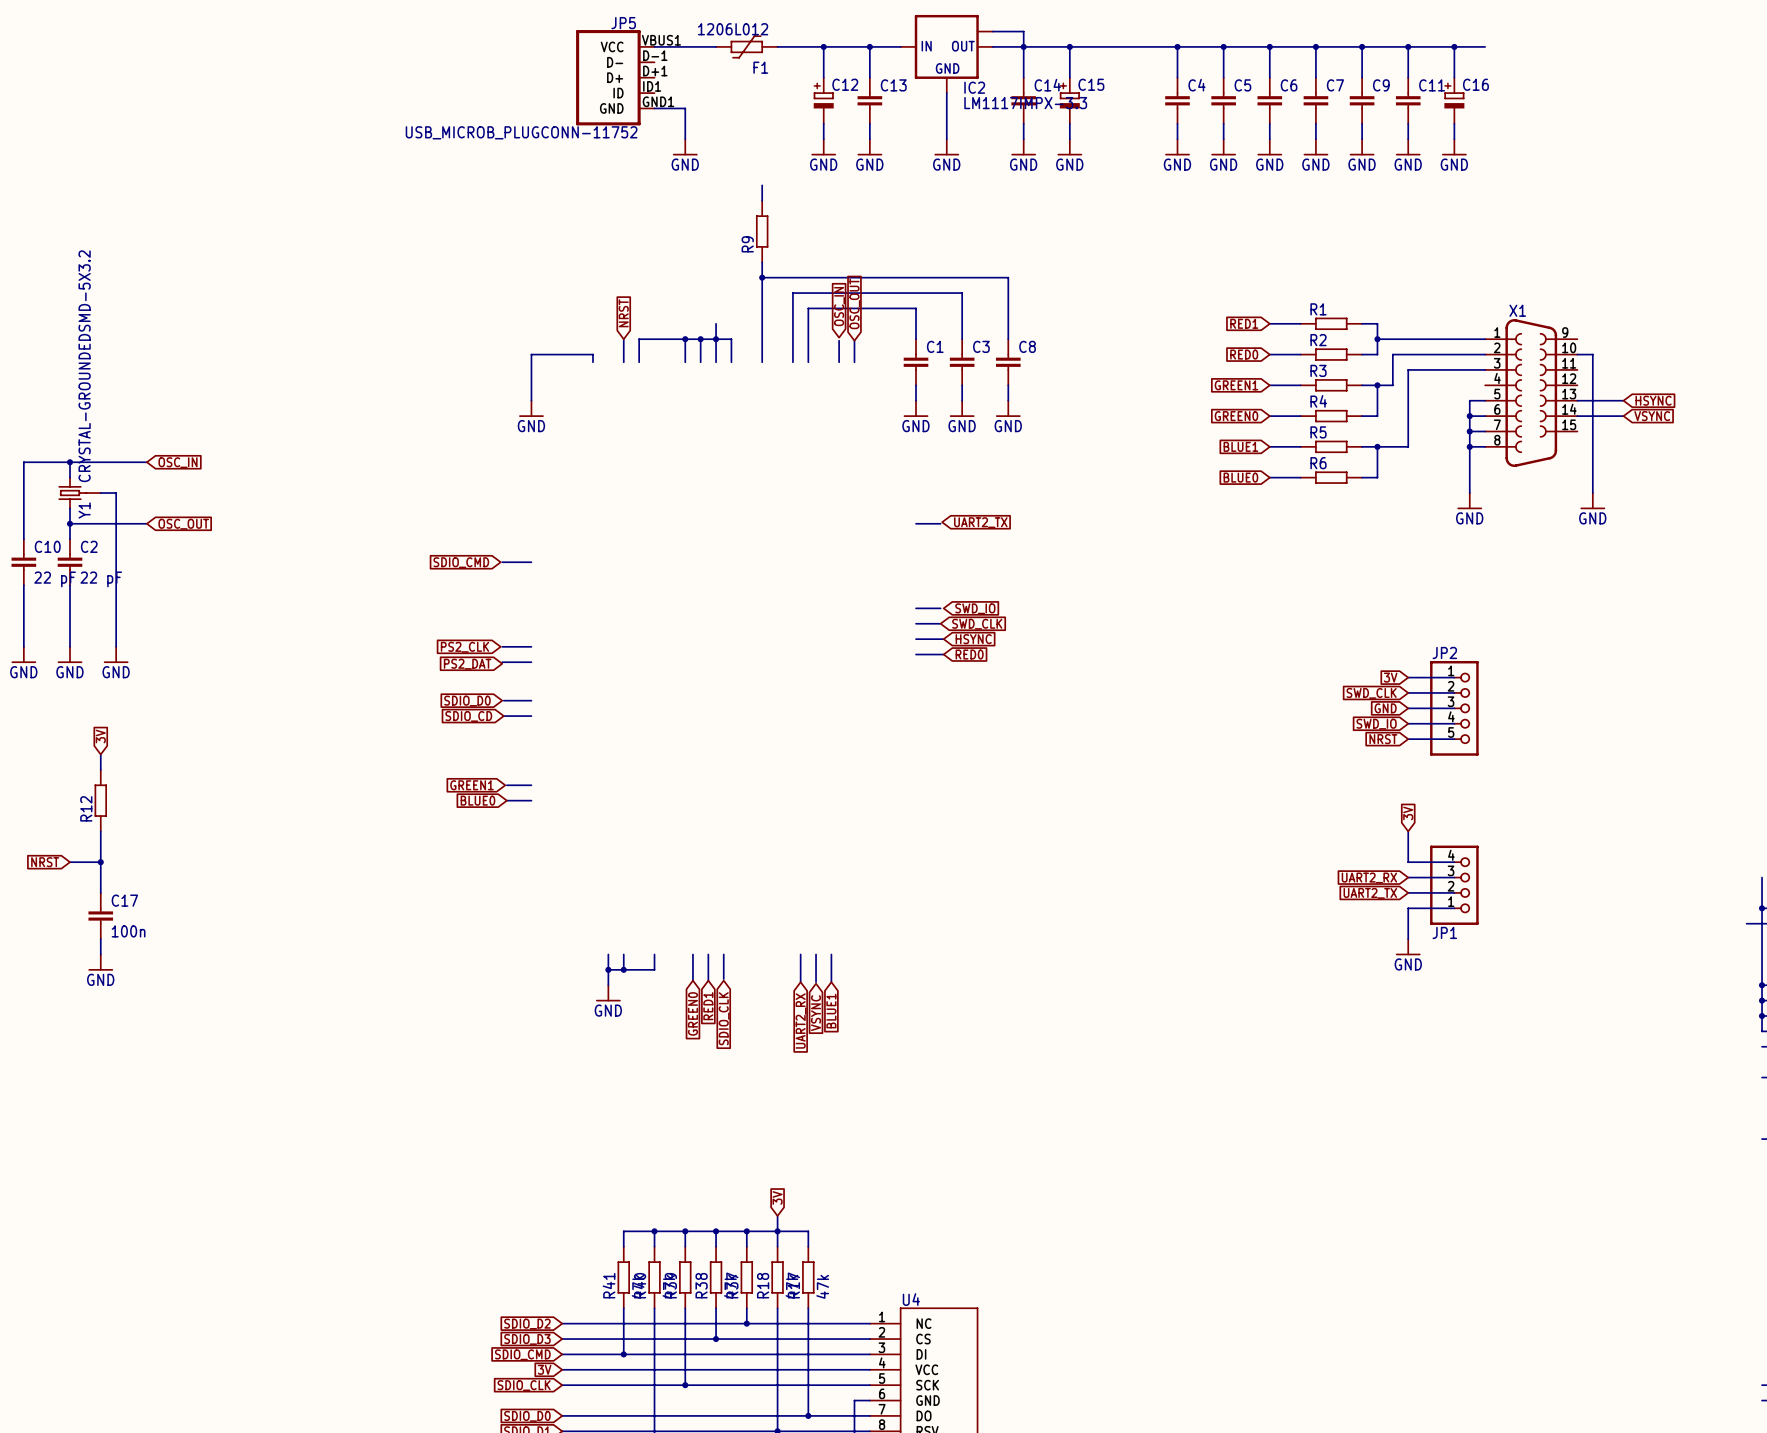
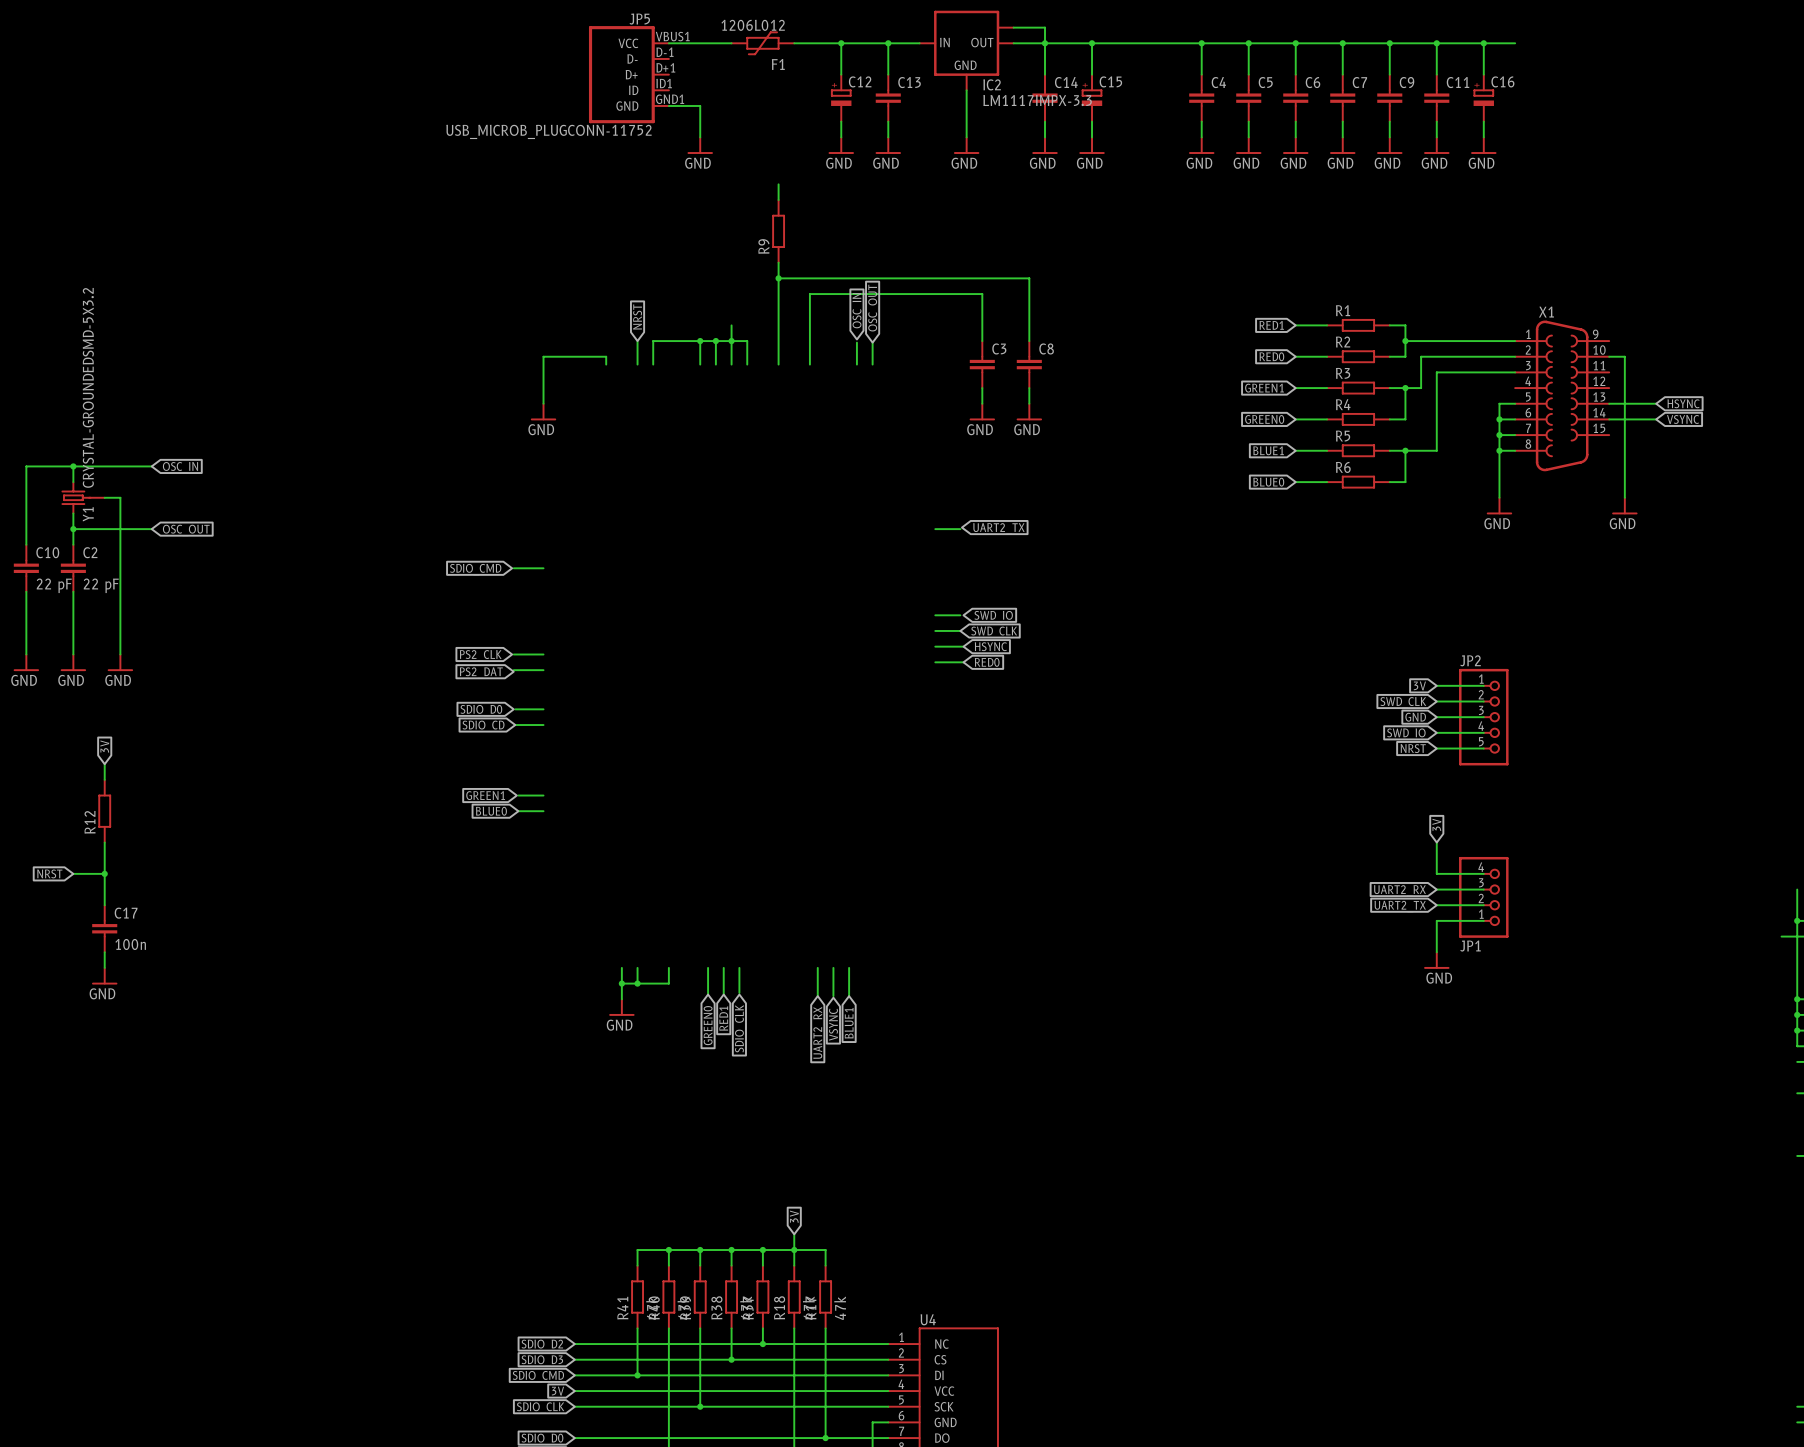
wire: (916, 339) (916, 308) (808, 308) (808, 362) -> none
C1: (916, 362) -> none
wire: (916, 385) (916, 400) -> none
power symbol: GND (916, 408) -> none

